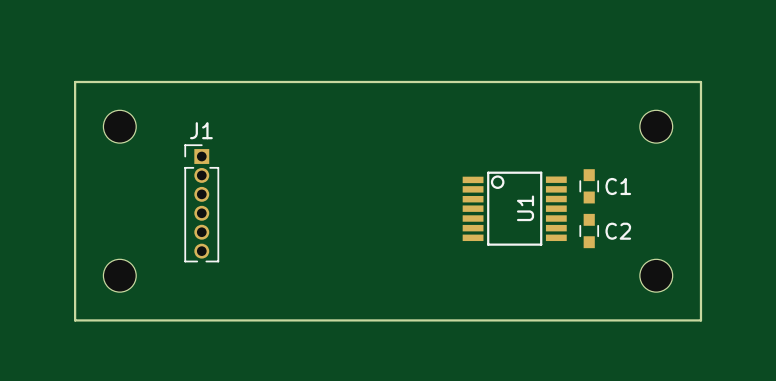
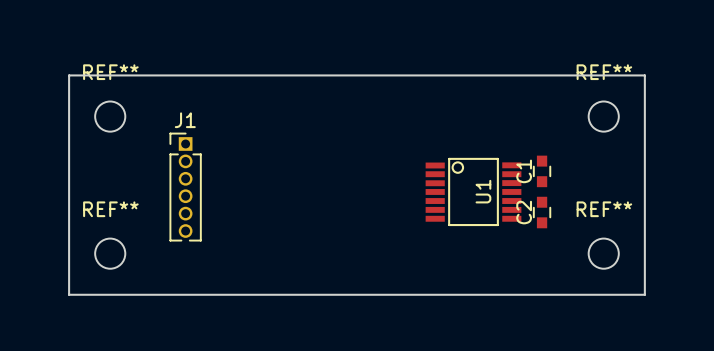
REF** name: none -> REF** (110, 72)
REF** name: none -> REF** (604, 72)
C1 name rotation: 0° (618, 186) -> 90° counterclockwise (524, 171)
C1 name position: C1 (618, 186) -> C1 (524, 171)
REF** name: none -> REF** (110, 209)
REF** name: none -> REF** (604, 209)
C2 name rotation: 0° (618, 231) -> 90° counterclockwise (524, 212)
C2 name position: C2 (618, 231) -> C2 (524, 212)

